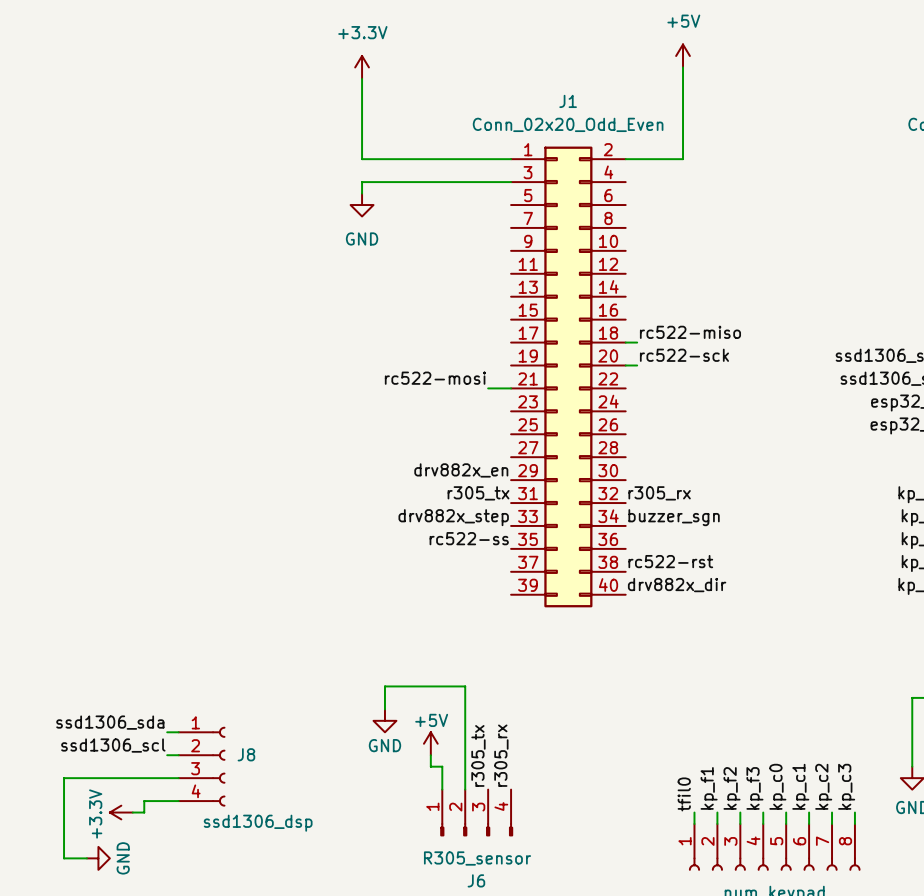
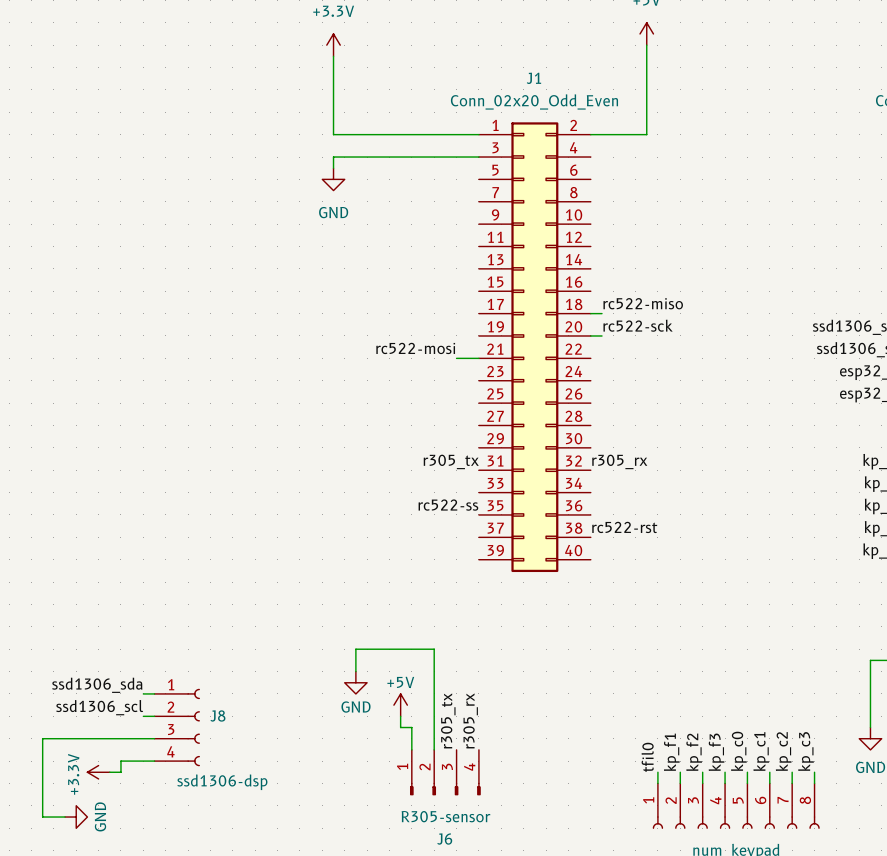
label: drv882x_en (461, 470) -> none
label: drv882x_step (453, 517) -> none
label: buzzer_sgn (674, 517) -> none
label: drv882x_dir (677, 585) -> none
J8 value: ssd1306_dsp (258, 823) -> ssd1306-dsp (222, 782)
J6 value: R305_sensor (477, 858) -> R305-sensor (445, 816)

